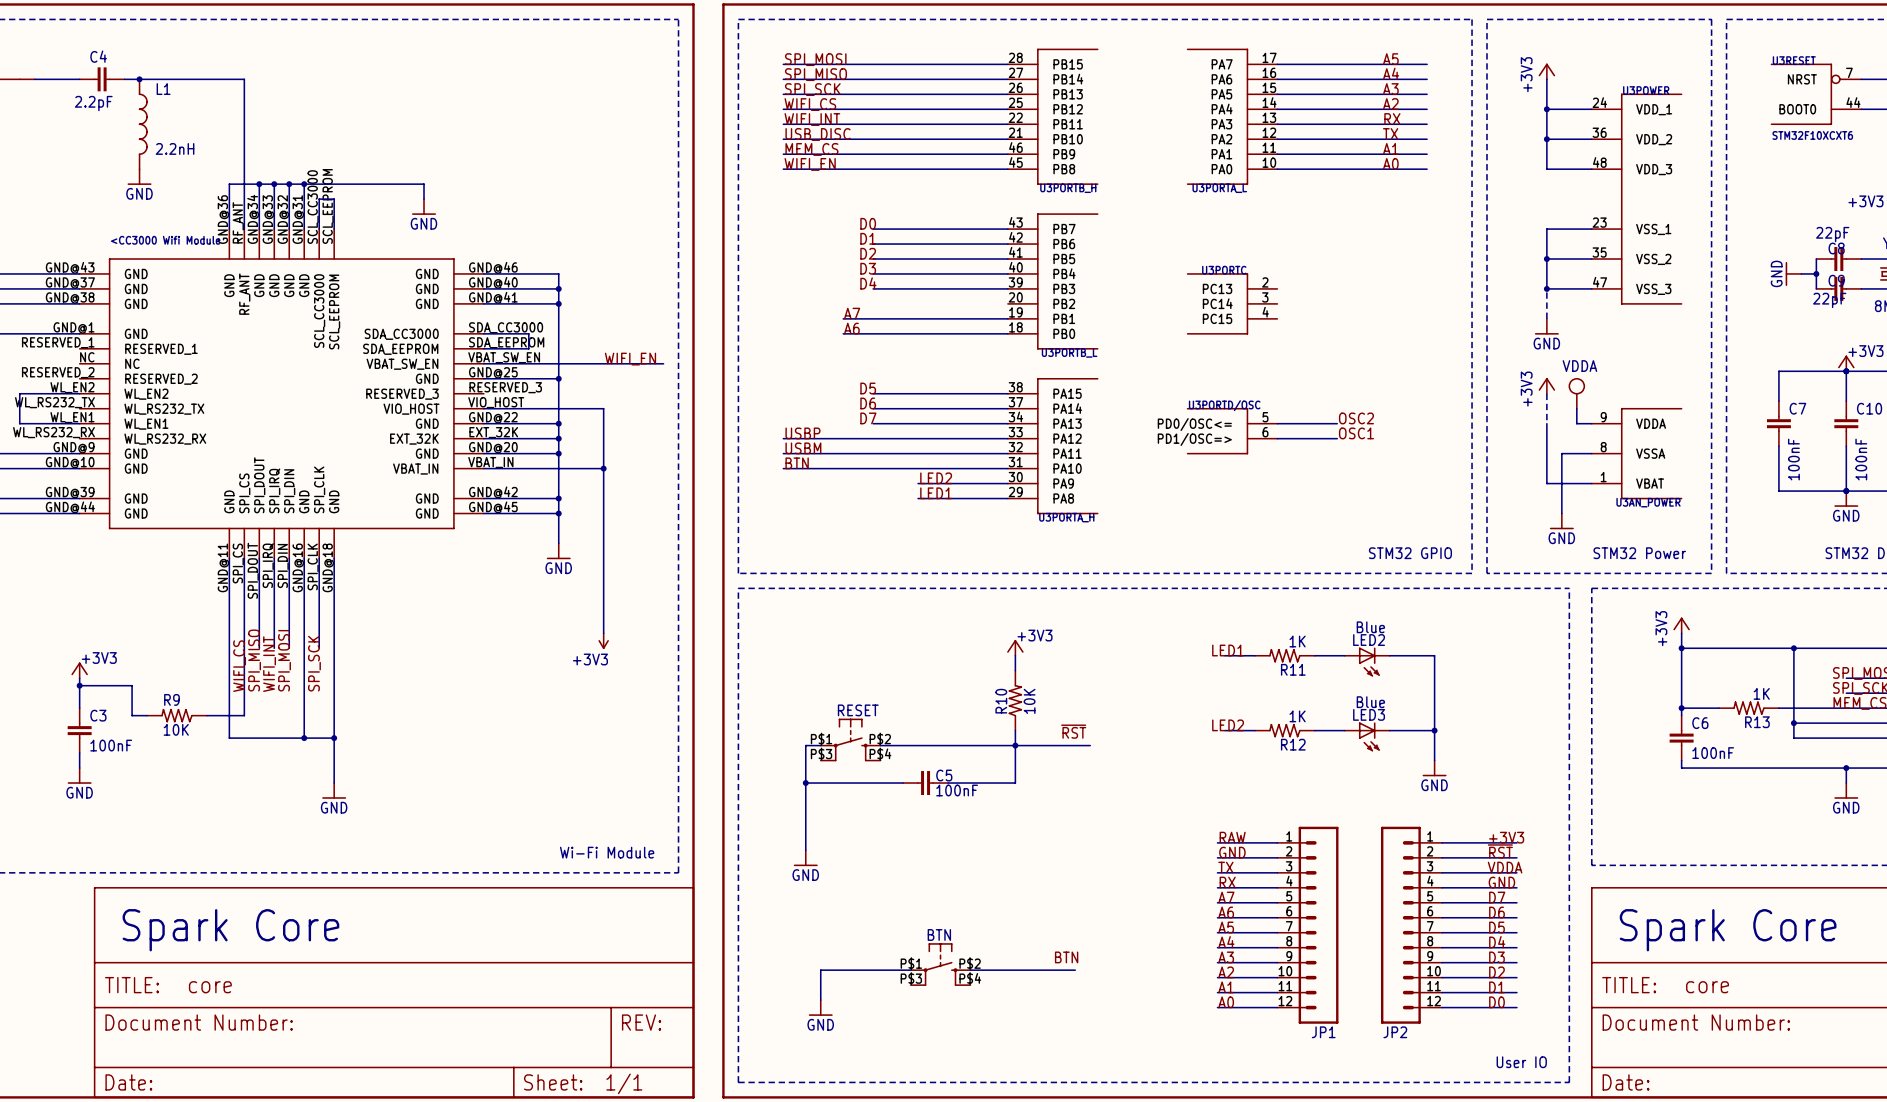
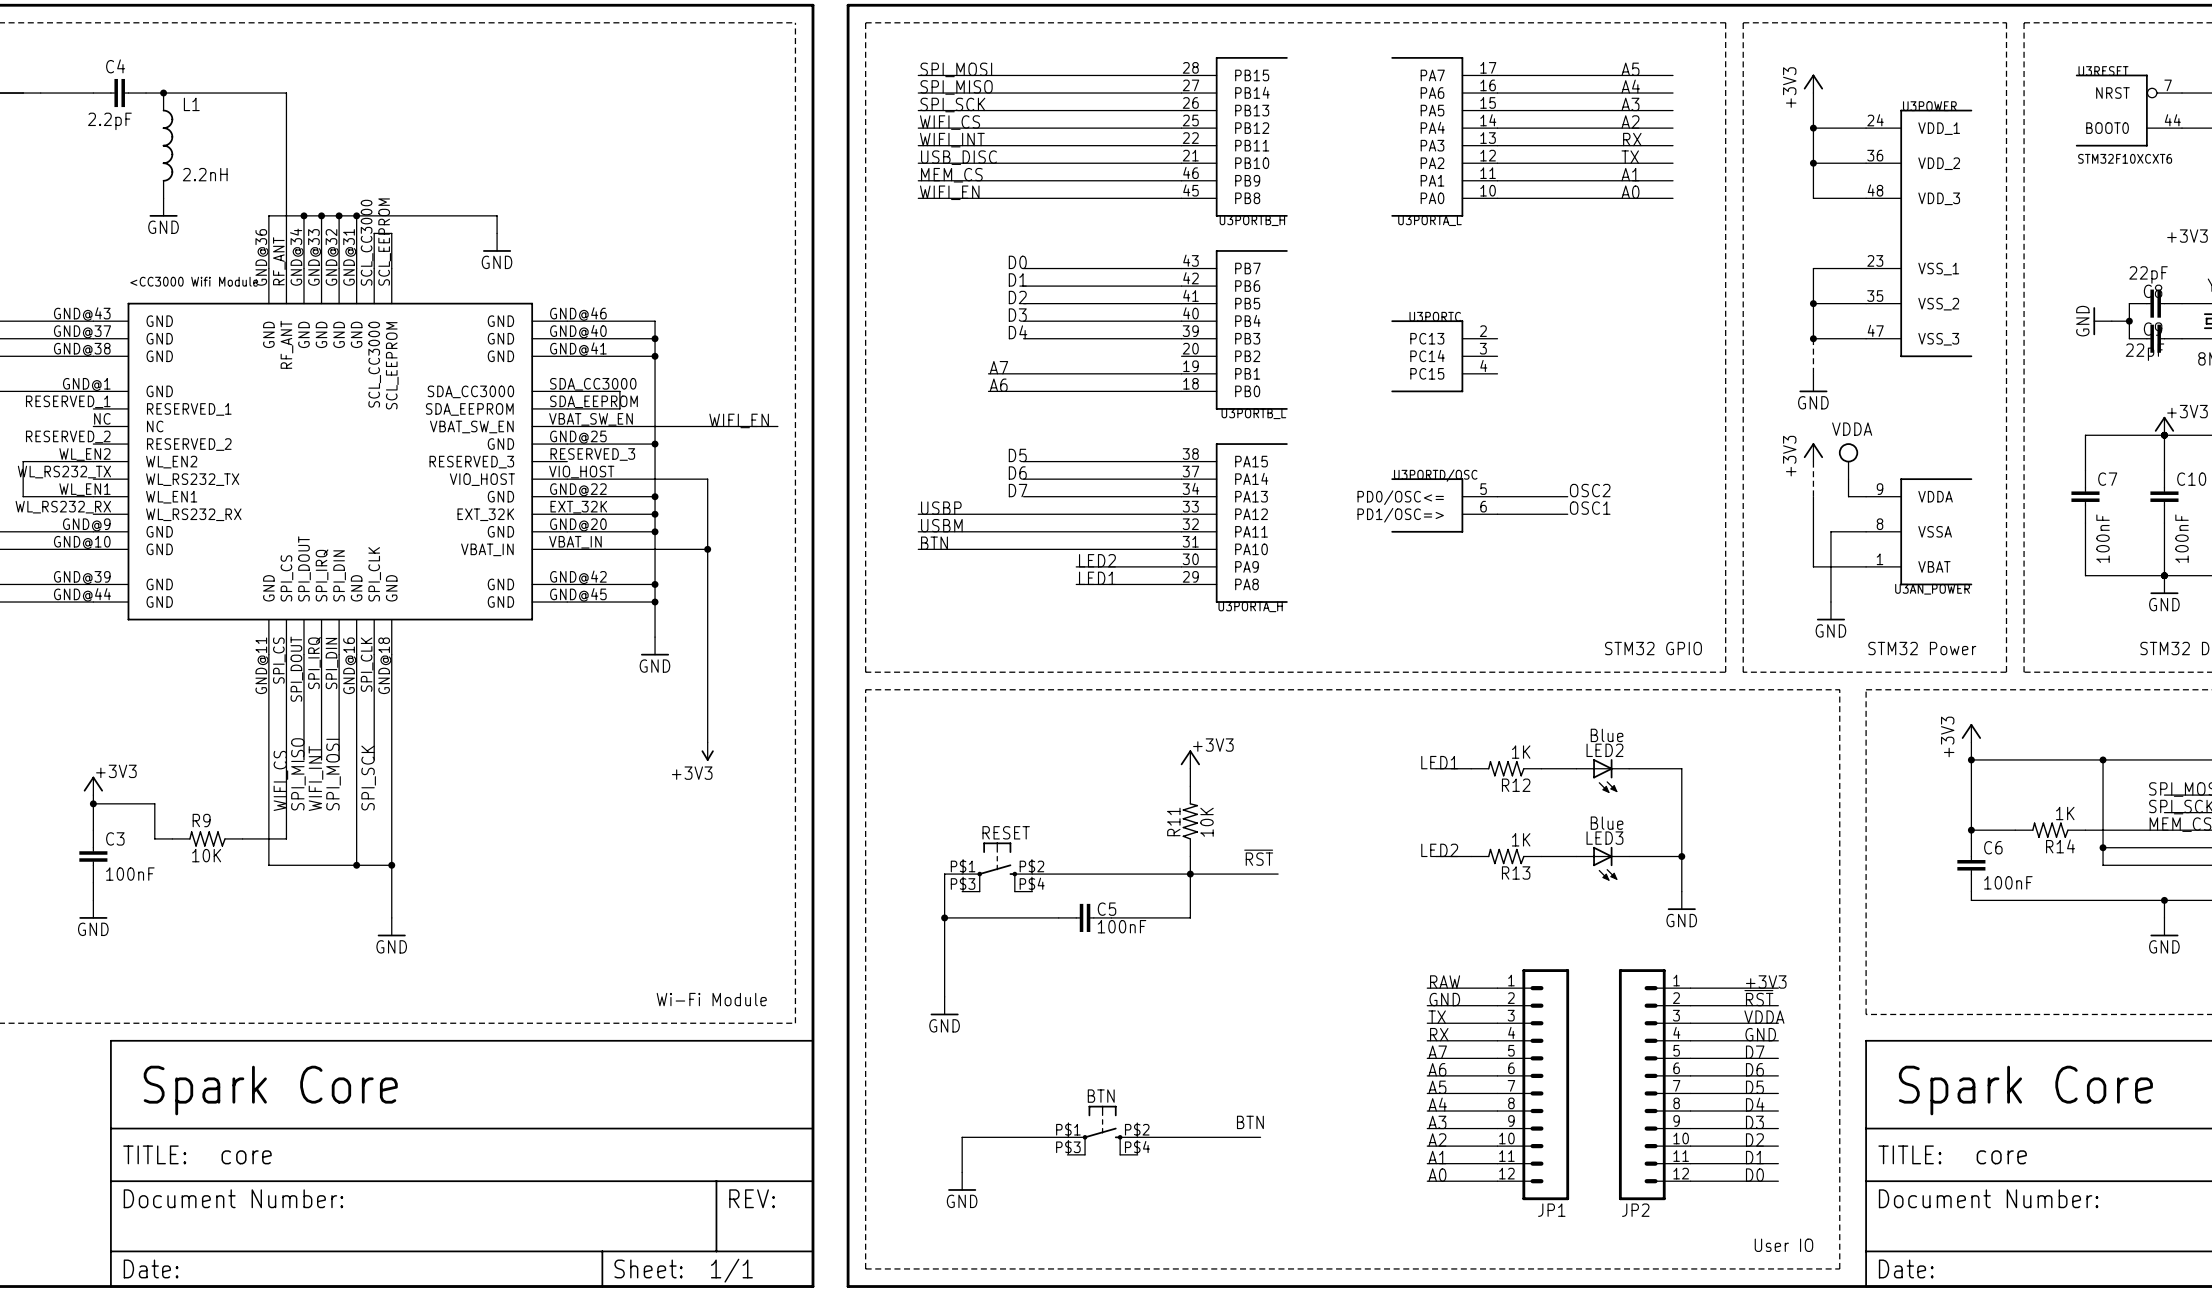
R11 name: R11 (1293, 669) -> R12 (1516, 785)
R10 name: R10 (1001, 701) -> R11 (1173, 821)
R13 name: R13 (1757, 722) -> R14 (2060, 846)
R12 name: R12 (1293, 744) -> R13 (1516, 873)

